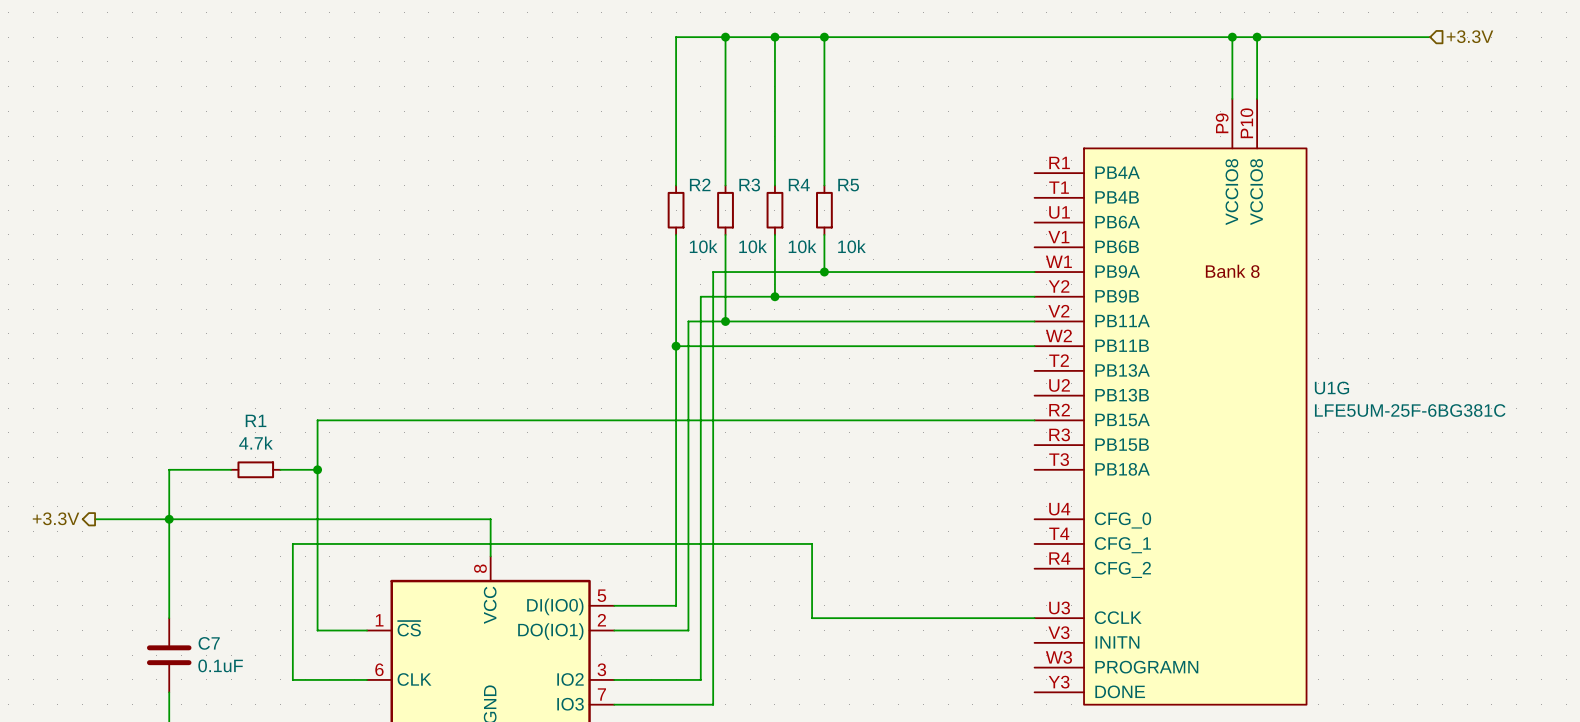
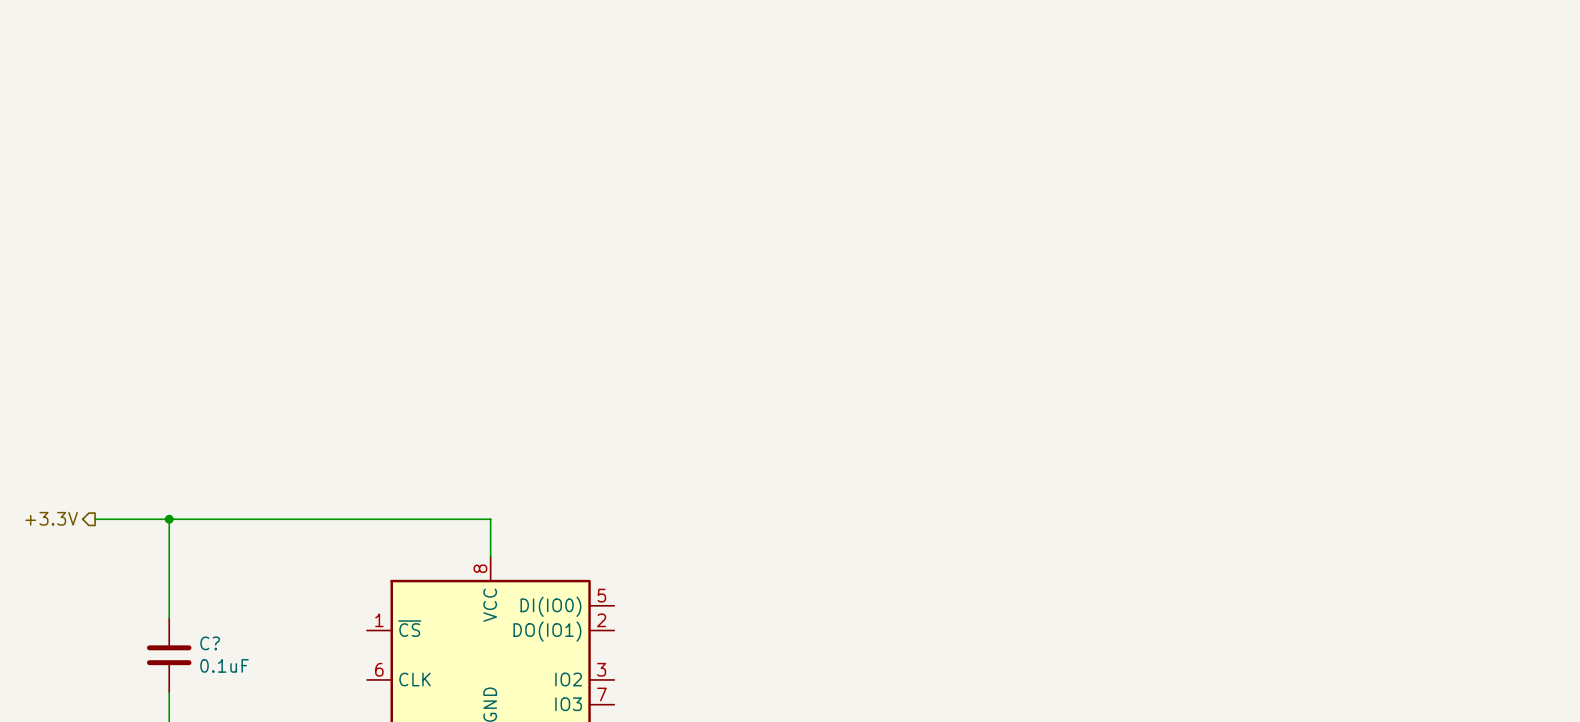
hierarchical label: +3.3V (1469, 36) -> none
wire: (725, 37) (725, 185) -> none
junction: (725, 37) -> none
wire: (774, 37) (774, 185) -> none
junction: (774, 37) -> none
wire: (824, 37) (824, 185) -> none
junction: (824, 37) -> none
wire: (1232, 37) (1232, 98) -> none
junction: (1232, 37) -> none
wire: (1257, 37) (1257, 98) -> none
junction: (1257, 37) -> none
wire: (1430, 37) (676, 37) (676, 185) -> none
R2: 10k (676, 210) -> none
R3: 10k (725, 210) -> none
R4: 10k (774, 210) -> none
R5: 10k (824, 210) -> none
wire: (676, 234) (676, 605) (614, 605) -> none
wire: (725, 234) (725, 321) -> none
wire: (774, 234) (774, 296) -> none
wire: (824, 234) (824, 272) -> none
junction: (824, 272) -> none
wire: (1034, 272) (713, 272) (713, 704) (614, 704) -> none
junction: (774, 296) -> none
wire: (1034, 296) (700, 296) (700, 679) (614, 679) -> none
junction: (725, 321) -> none
wire: (1034, 321) (688, 321) (688, 630) (614, 630) -> none
wire: (676, 346) (1034, 346) -> none
junction: (676, 346) -> none
U1G: LFE5UM-25F-6BG381C (1170, 401) -> none
wire: (1034, 420) (317, 420) (317, 630) (367, 630) -> none
wire: (231, 469) (169, 469) (169, 519) -> none
R1: 4.7k (255, 469) -> none
wire: (280, 469) (317, 469) -> none
junction: (317, 469) -> none
wire: (1034, 618) (812, 618) (812, 543) (292, 543) (292, 679) (367, 679) -> none
C7 name: C7 (209, 643) -> C? (210, 643)

